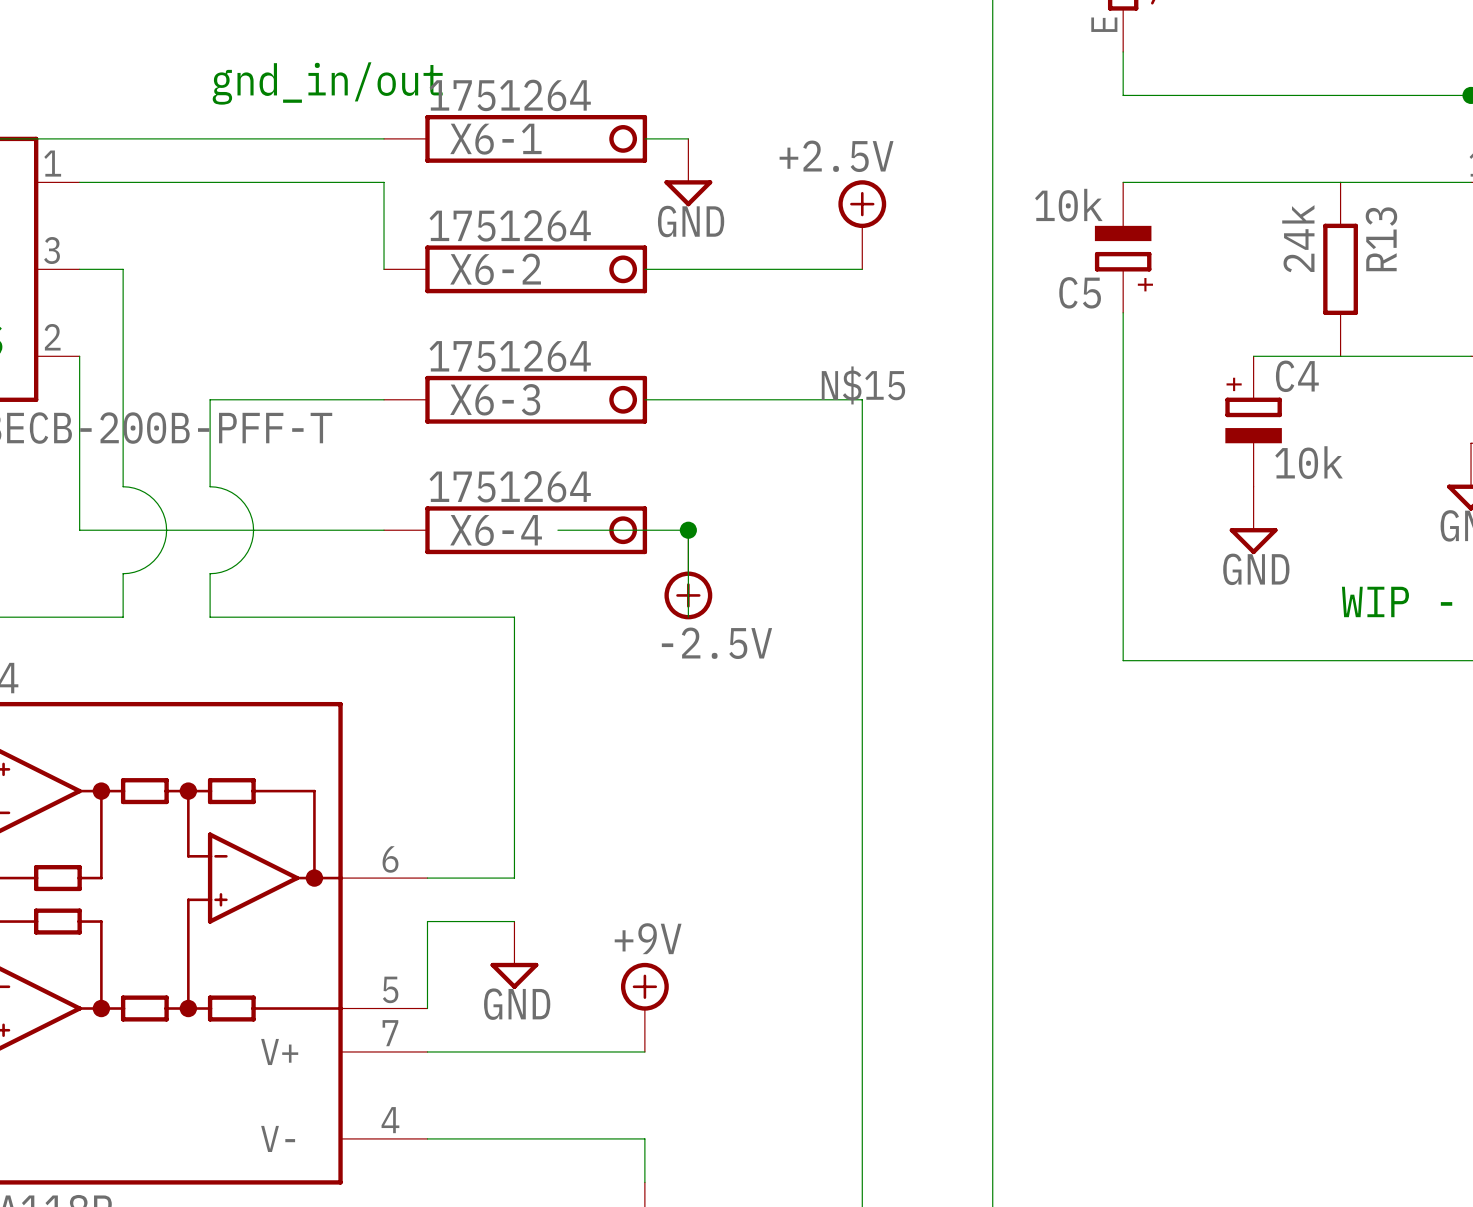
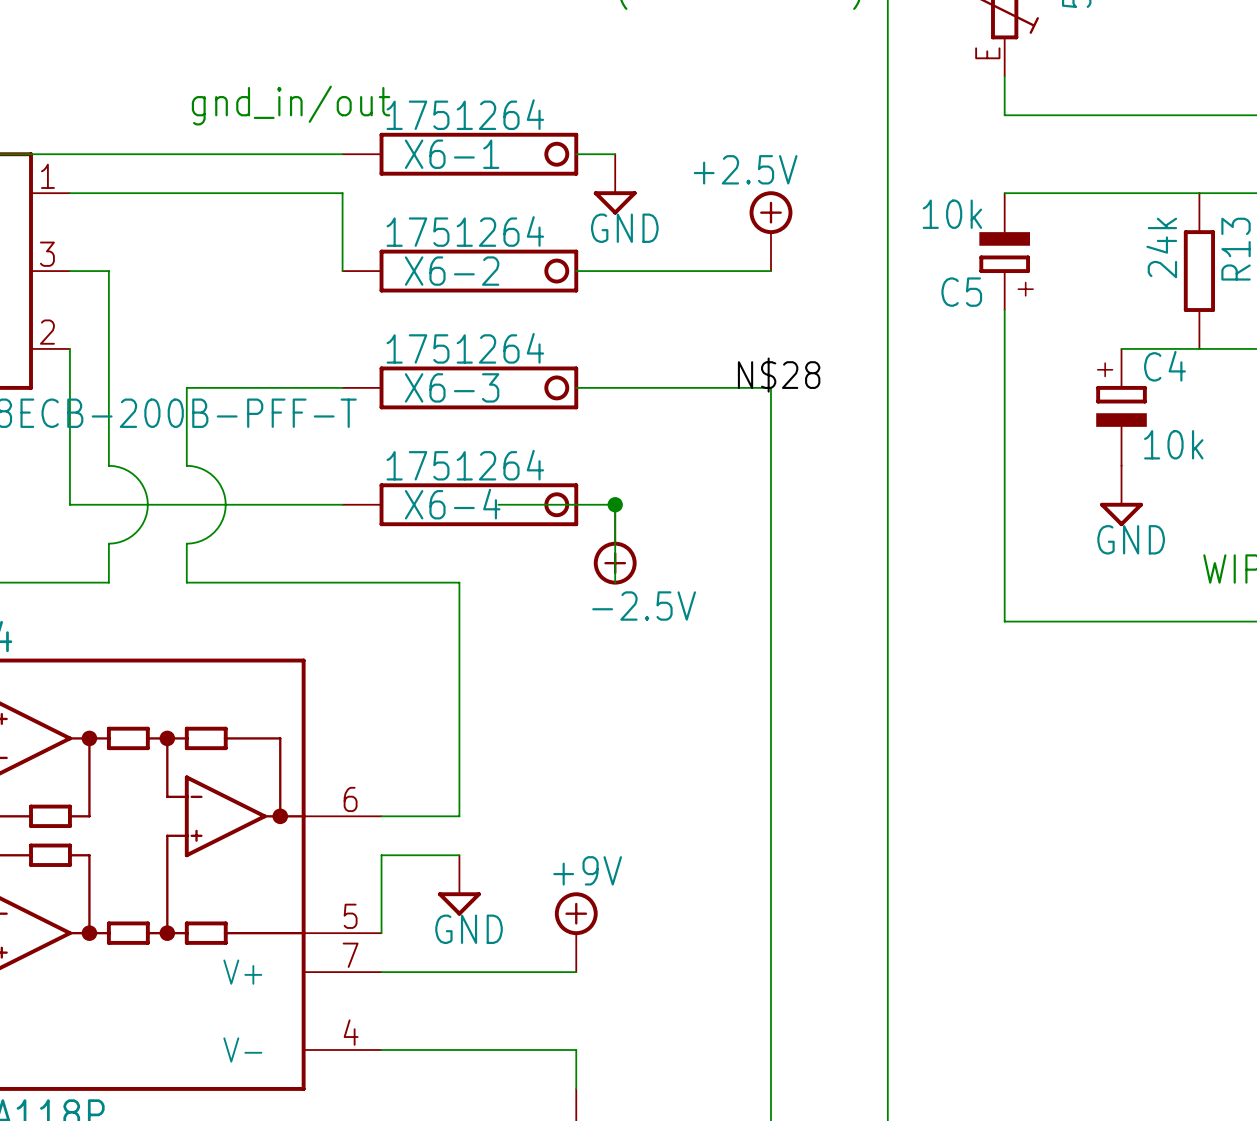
label: N$15 (863, 385) -> N$28 (779, 375)

